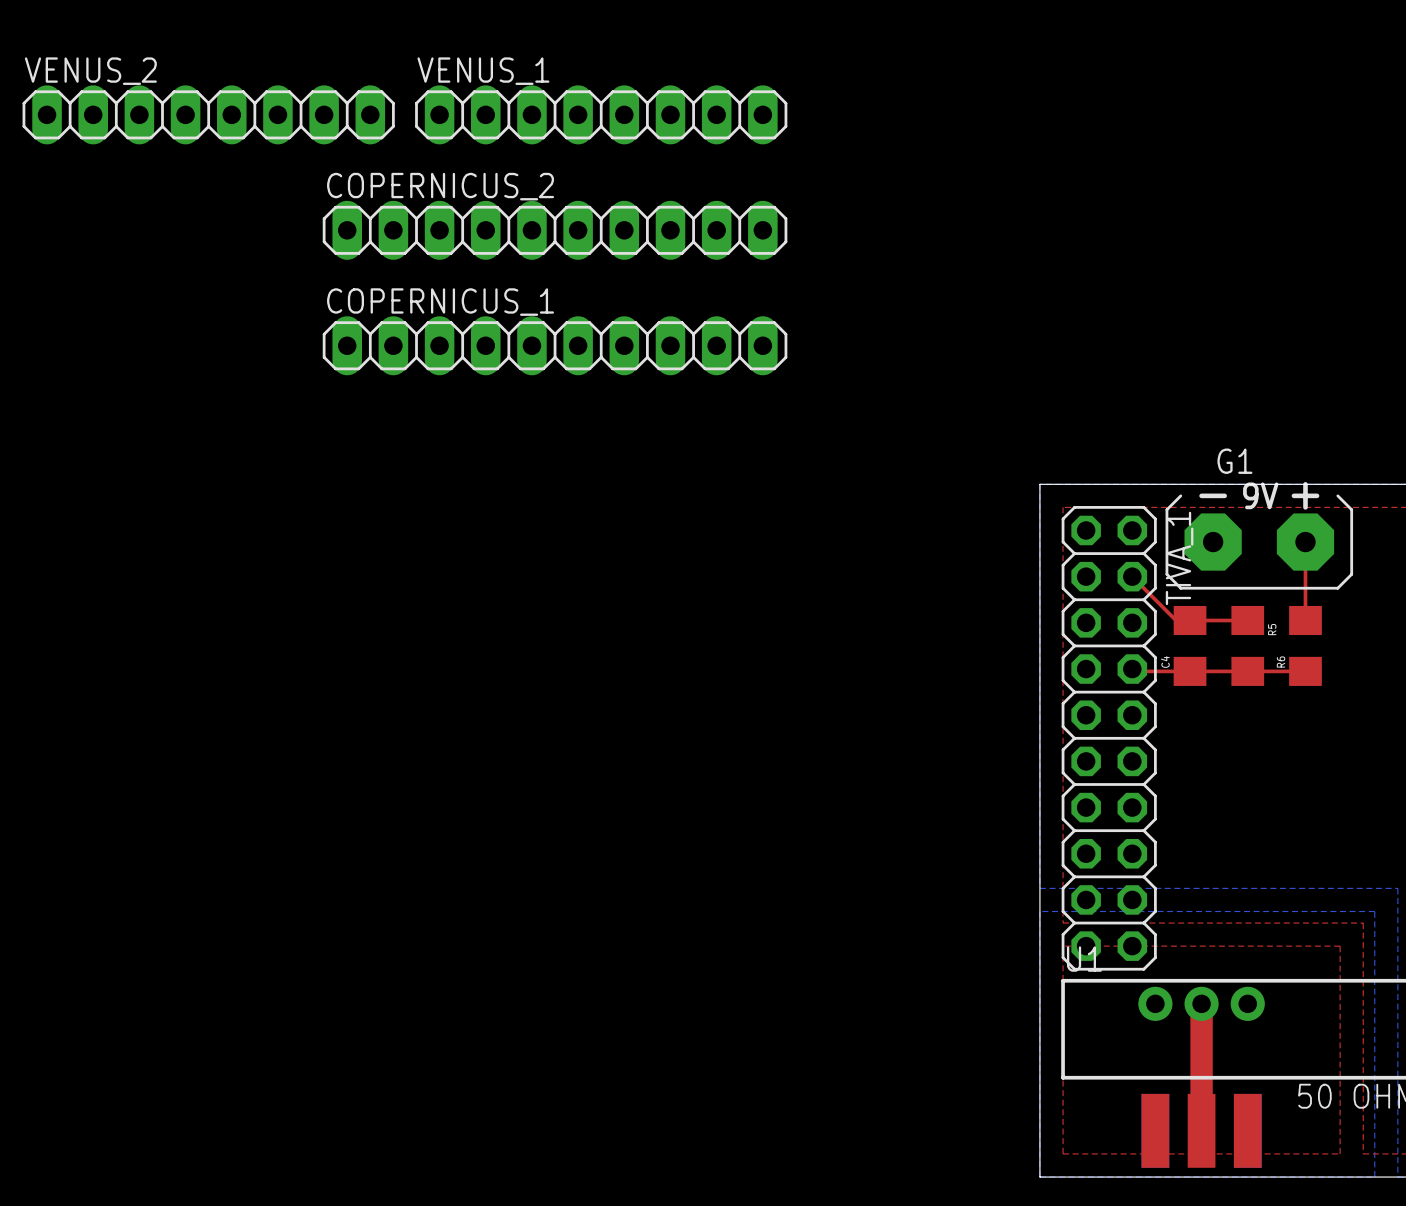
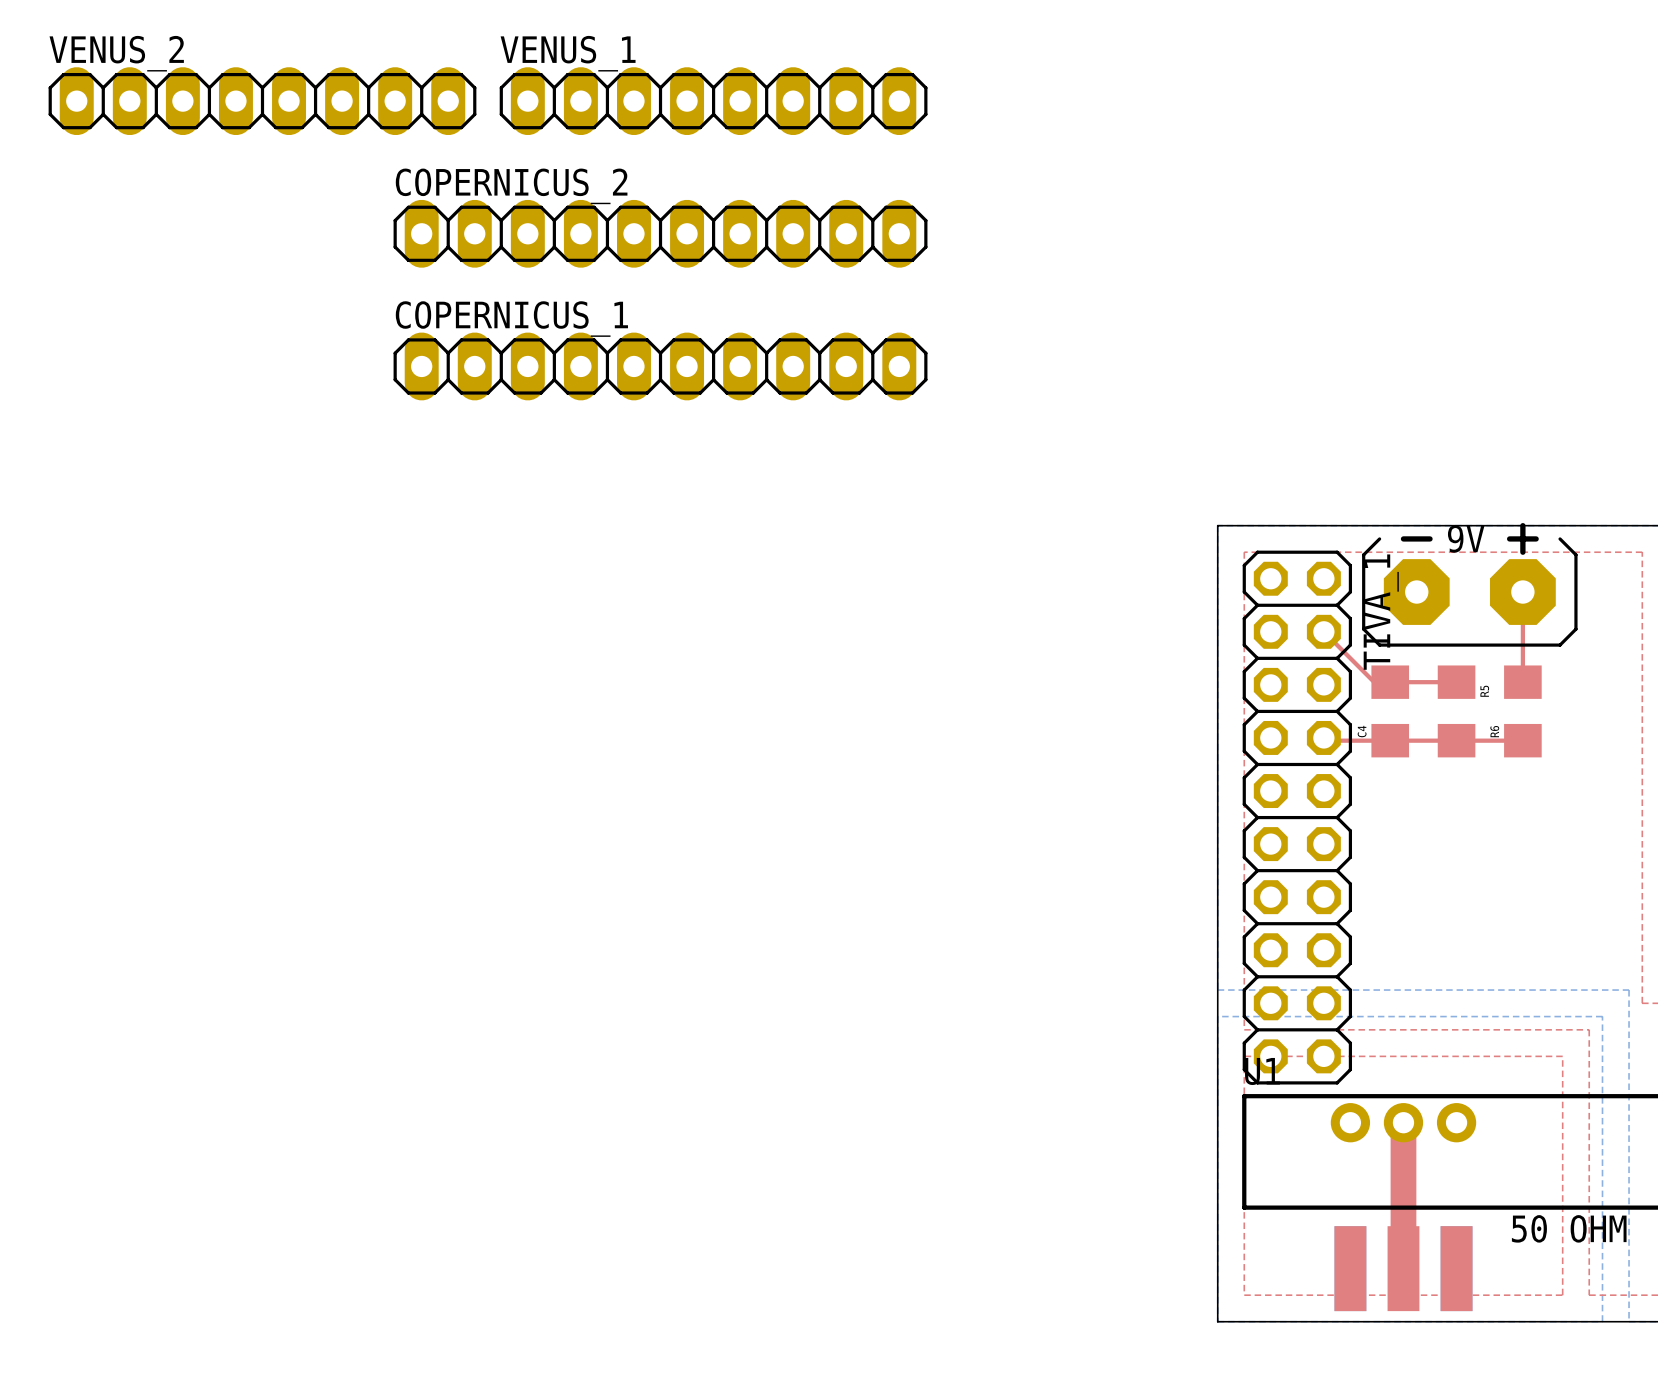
G1 name: G1 (1234, 461) -> none

